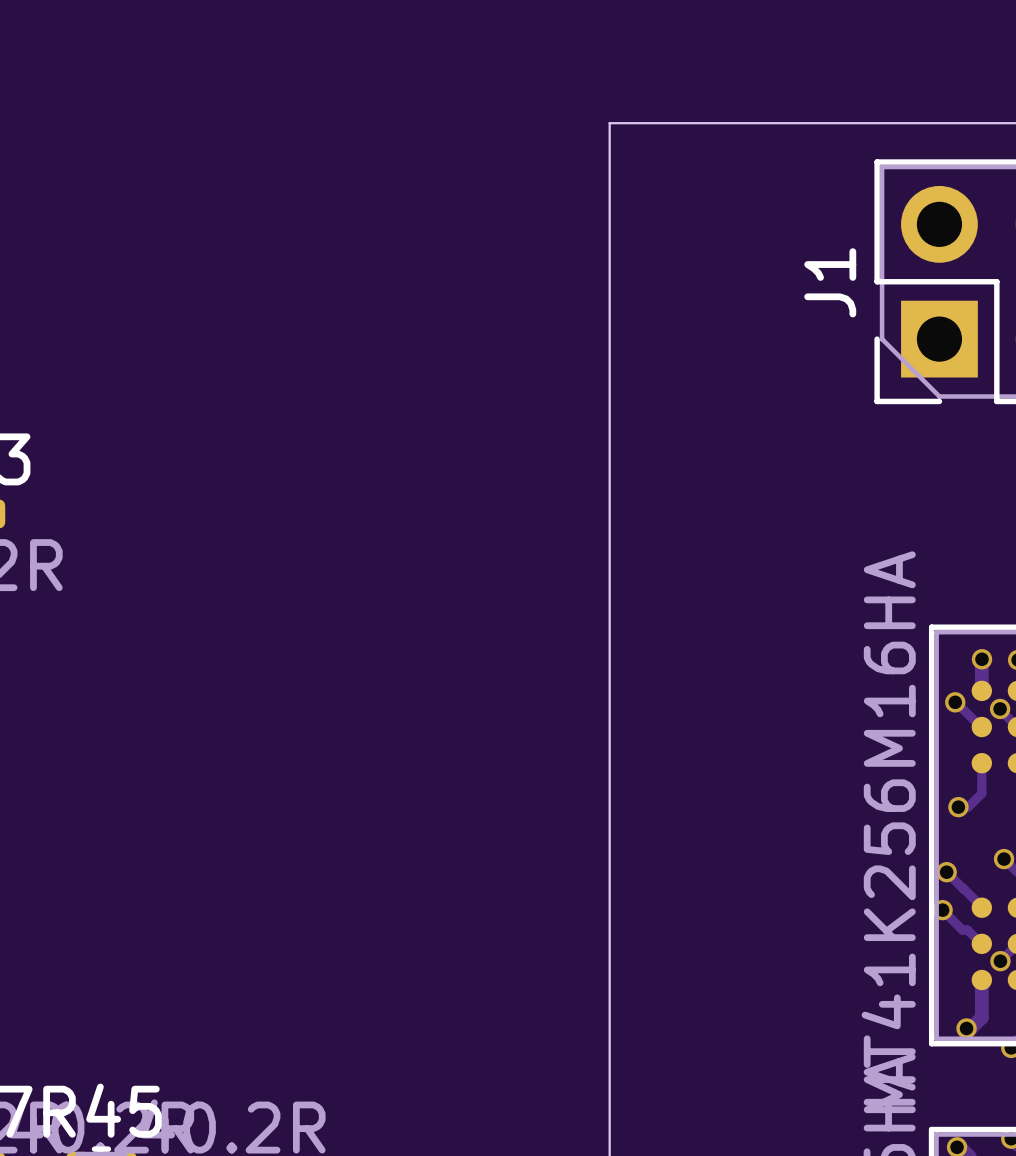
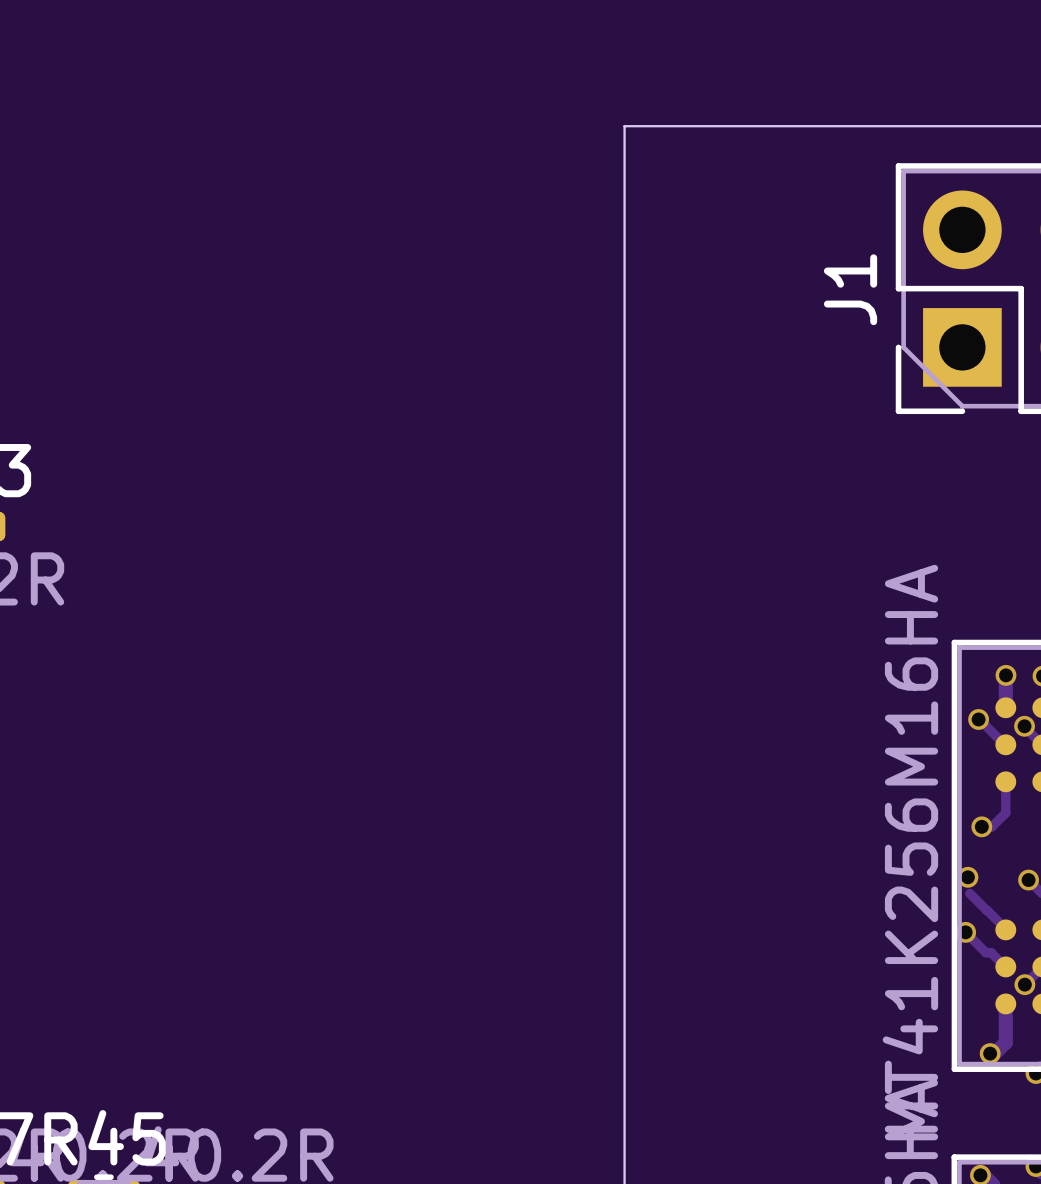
via position: (946, 872) -> (967, 877)

